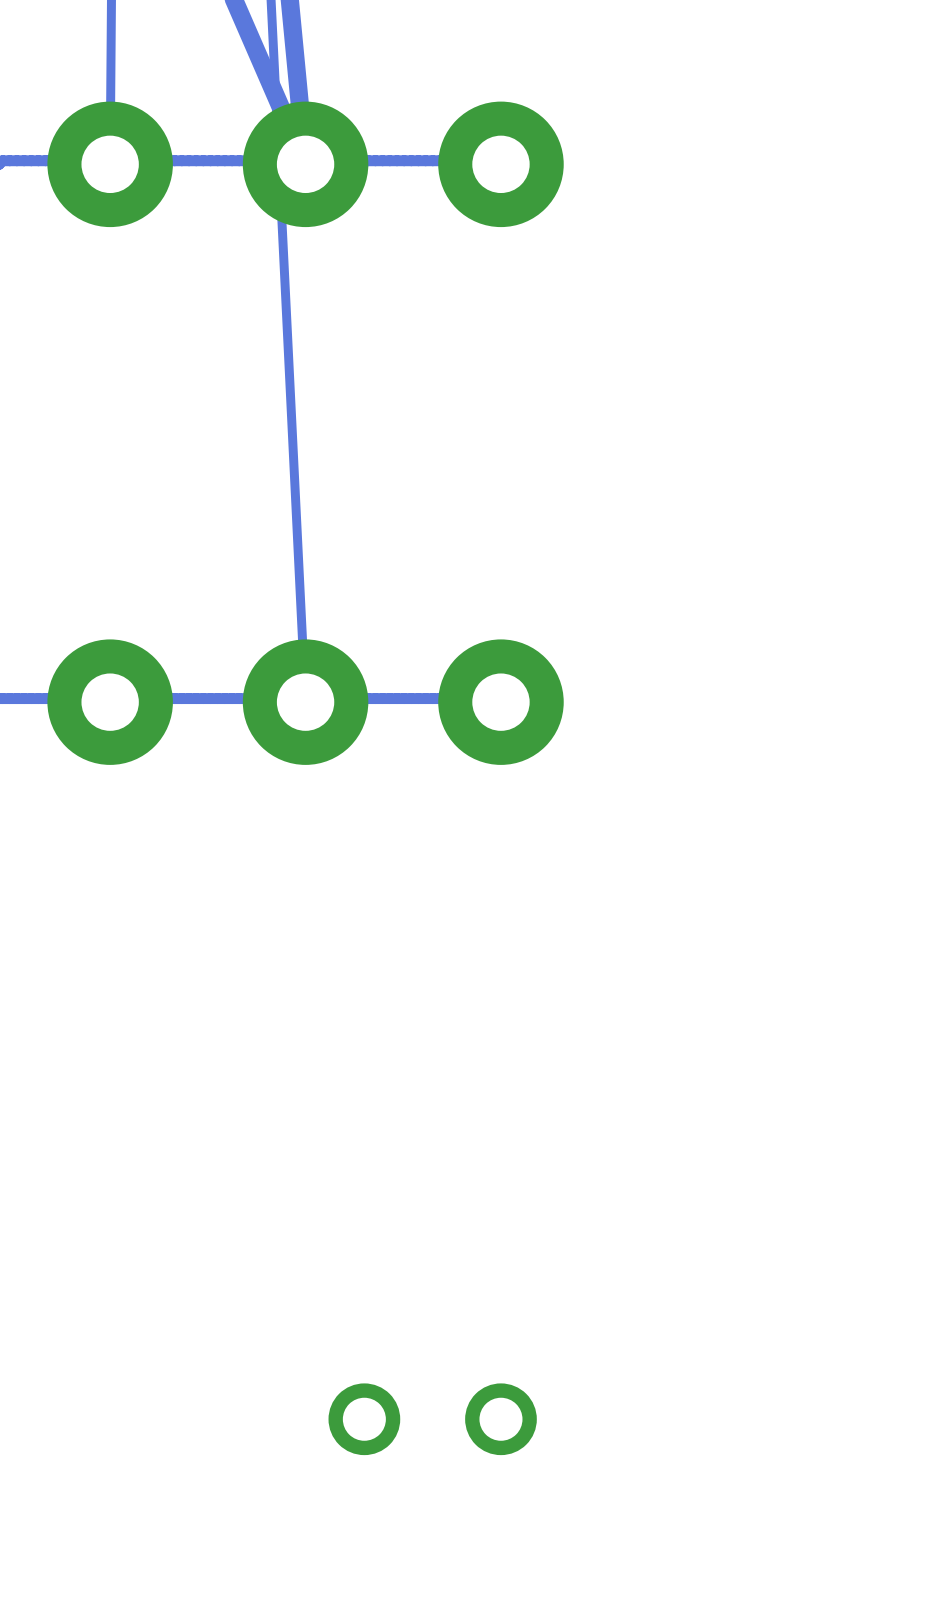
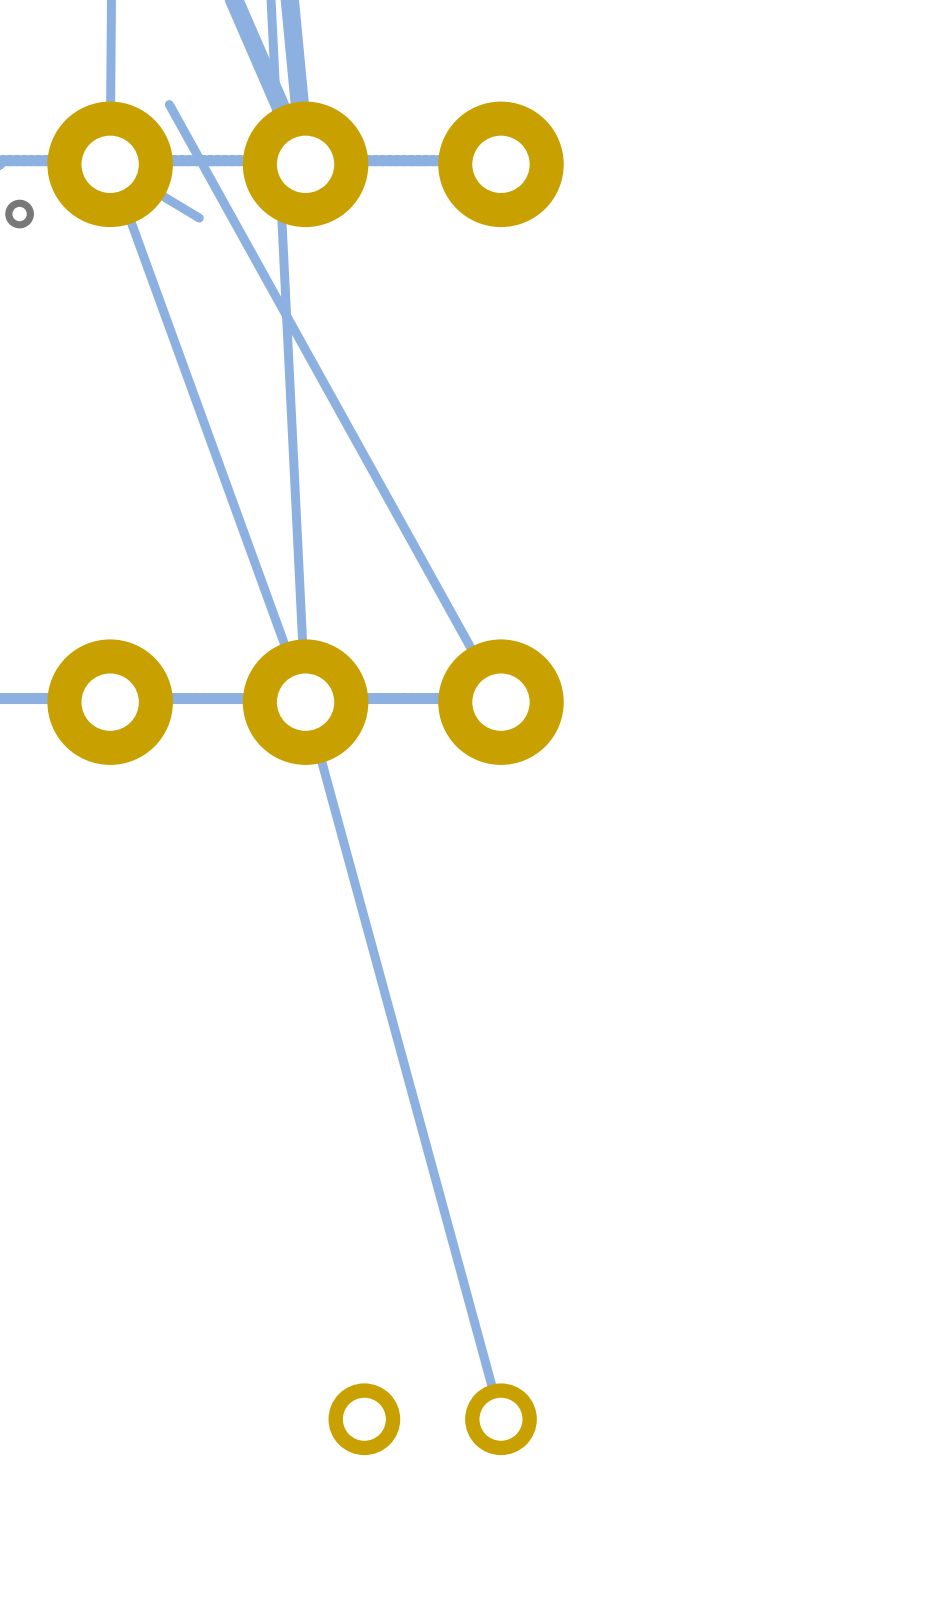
track: none -> (169, 104) (500, 702)
via: none -> (19, 214)
track: none -> (199, 218) (110, 164) (305, 702) (500, 1419)

